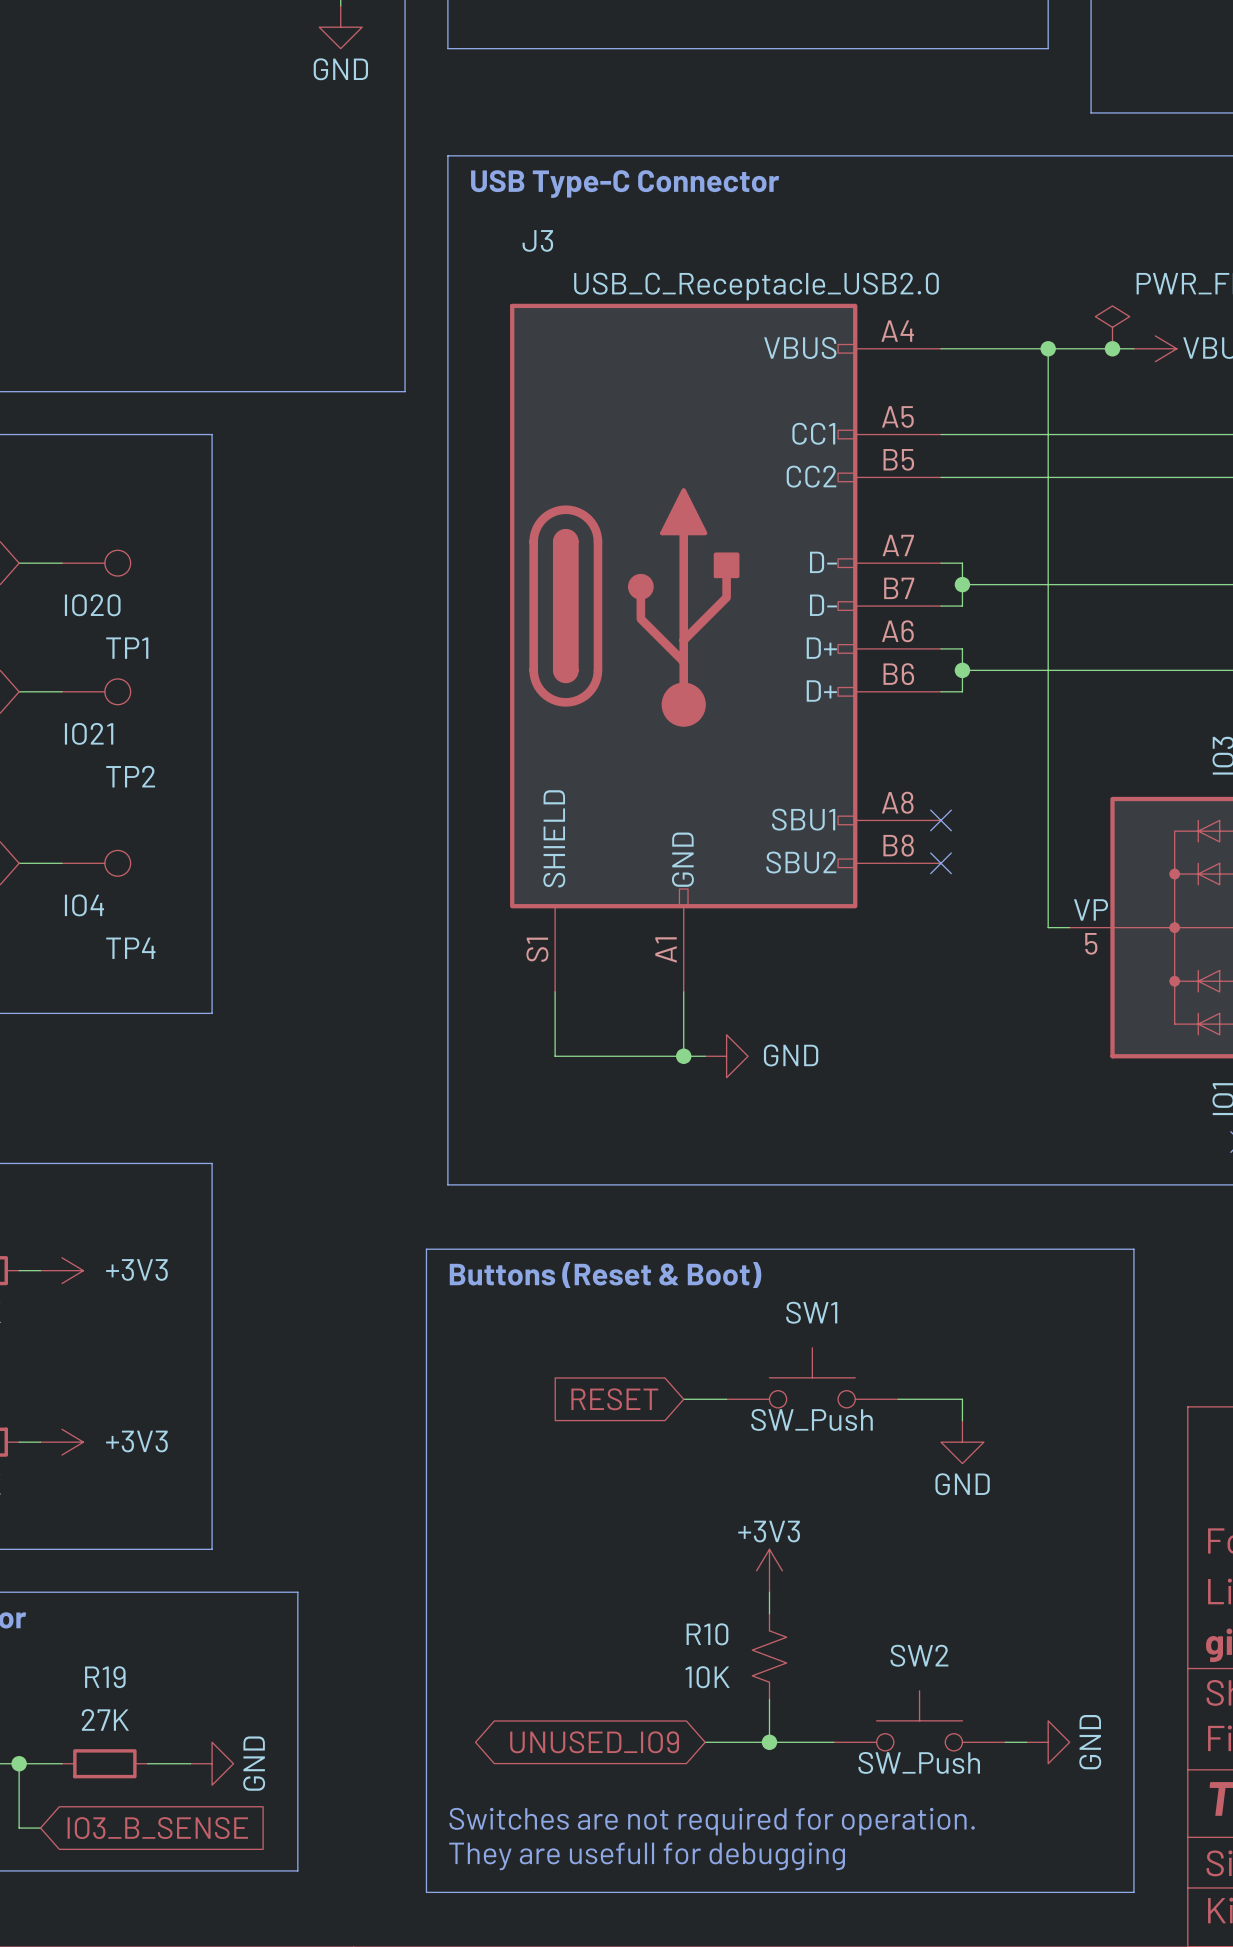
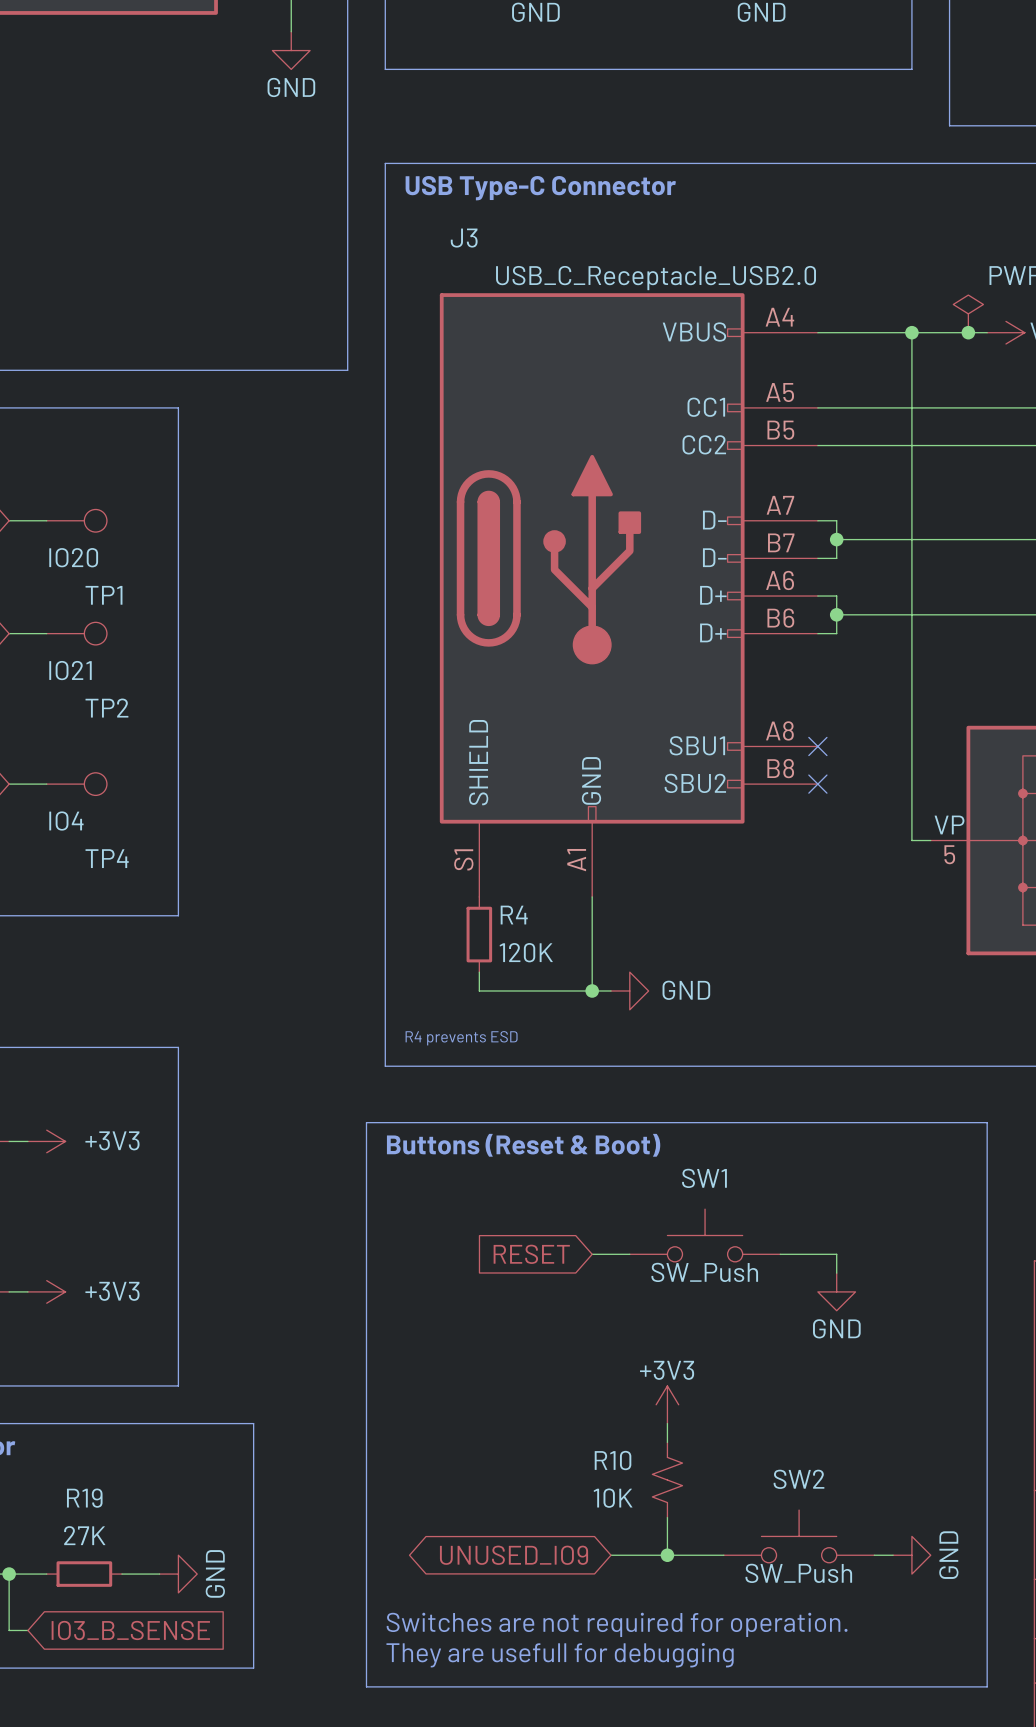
wire: (555, 991) (555, 1056) (705, 1056) -> none
R4: none -> 120K (479, 934)
wire: none -> (592, 953) (592, 990)
junction position: (683, 1056) -> (592, 990)
power symbol position: GND (726, 1056) -> GND (629, 990)
wire: none -> (479, 972) (479, 990) (611, 990)
text: none -> R4 prevents ESD (461, 1038)

